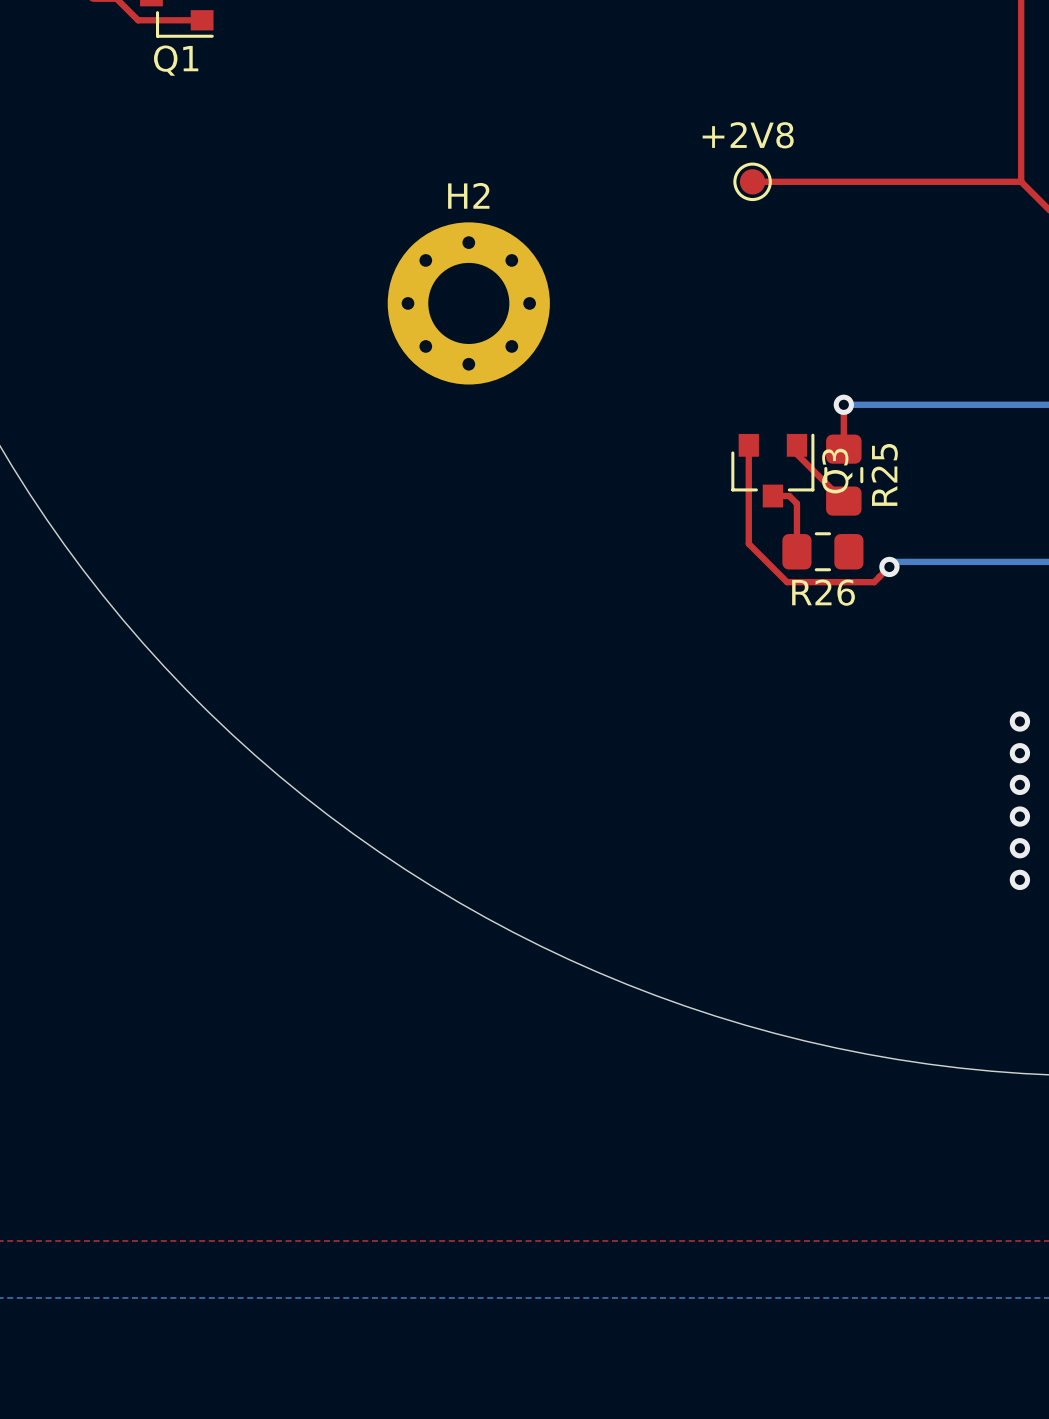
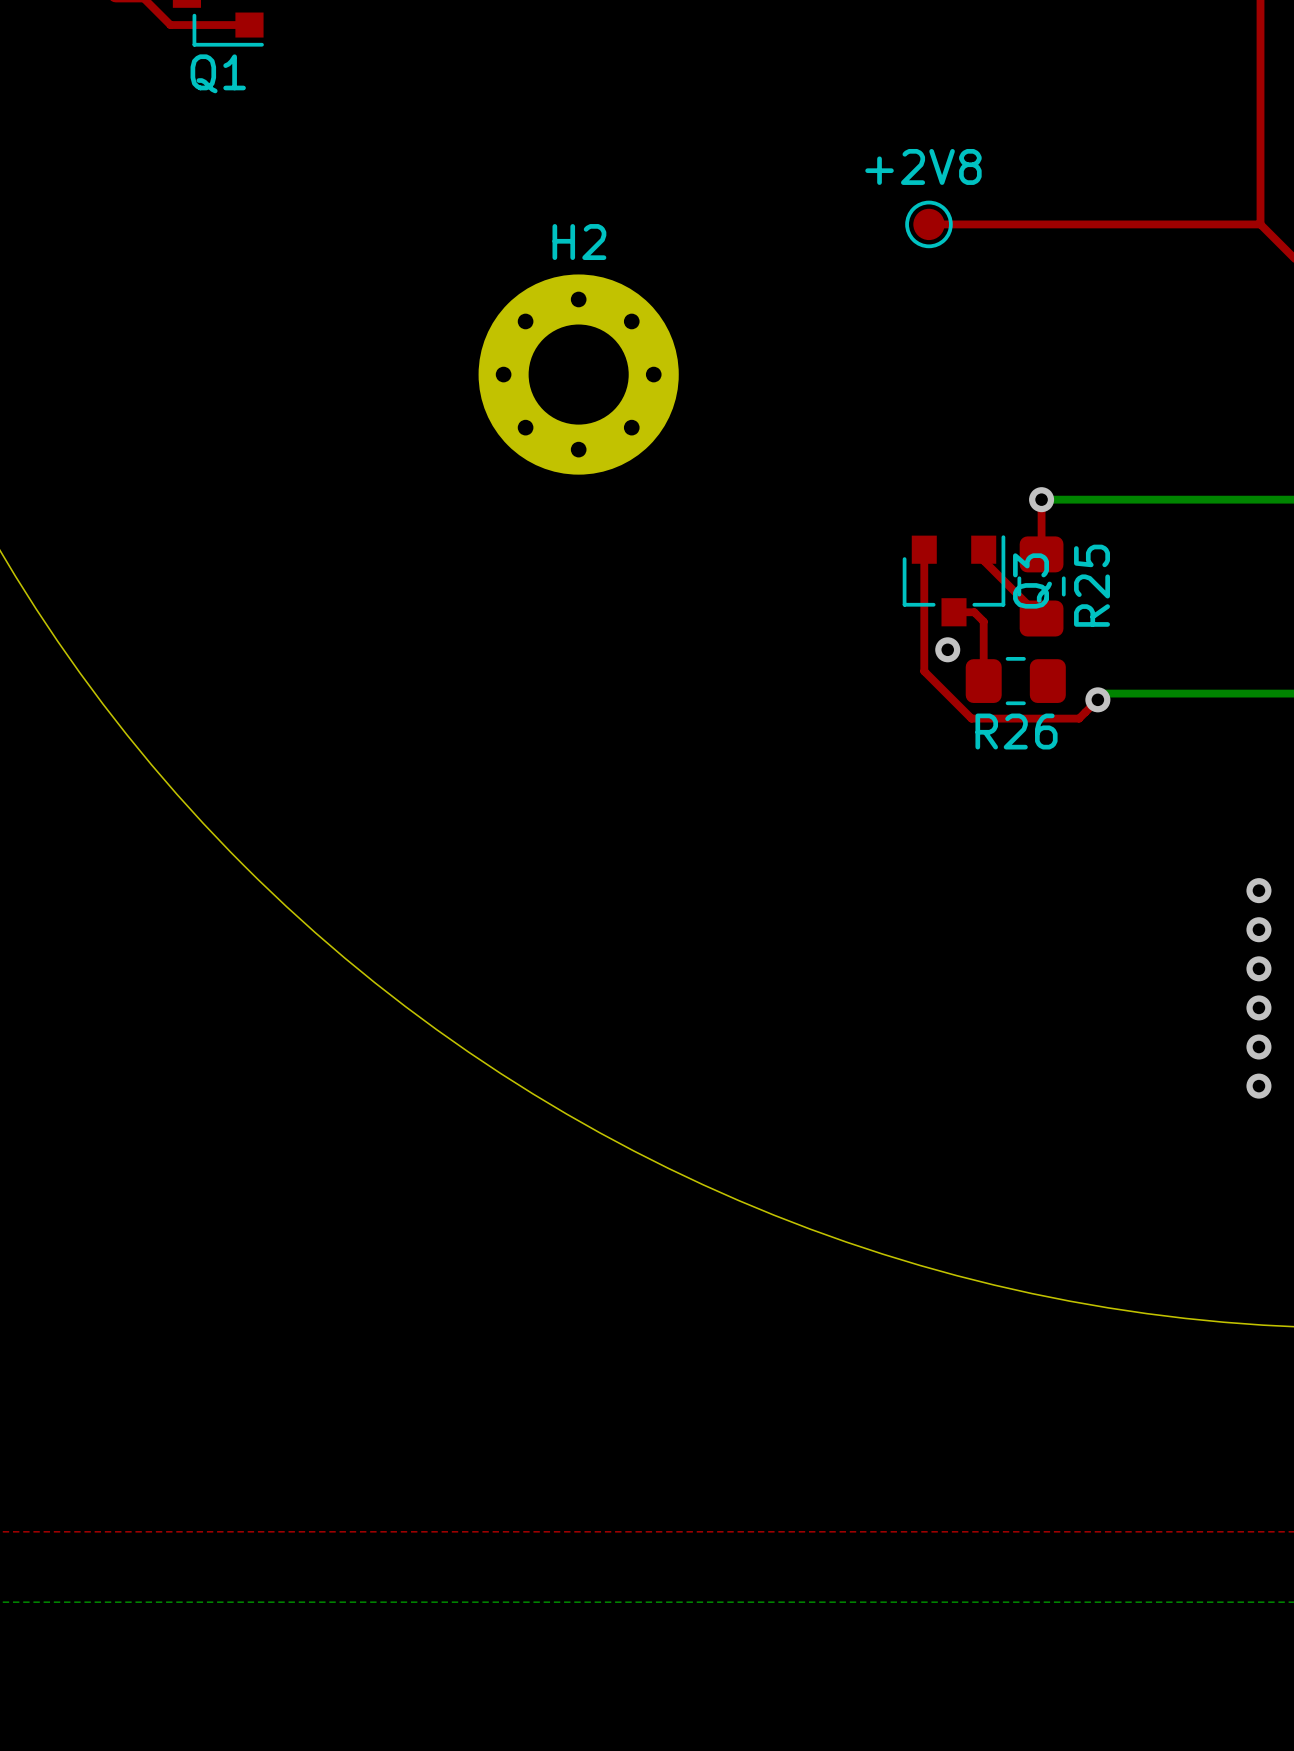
via: none -> (947, 649)

